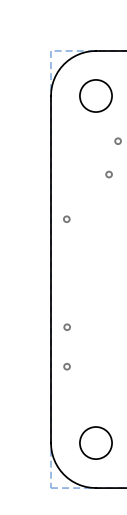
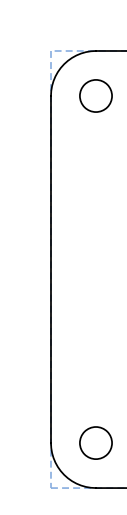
via: (118, 141) -> none
via: (109, 174) -> none
via: (66, 219) -> none
via: (67, 327) -> none
via: (67, 366) -> none

